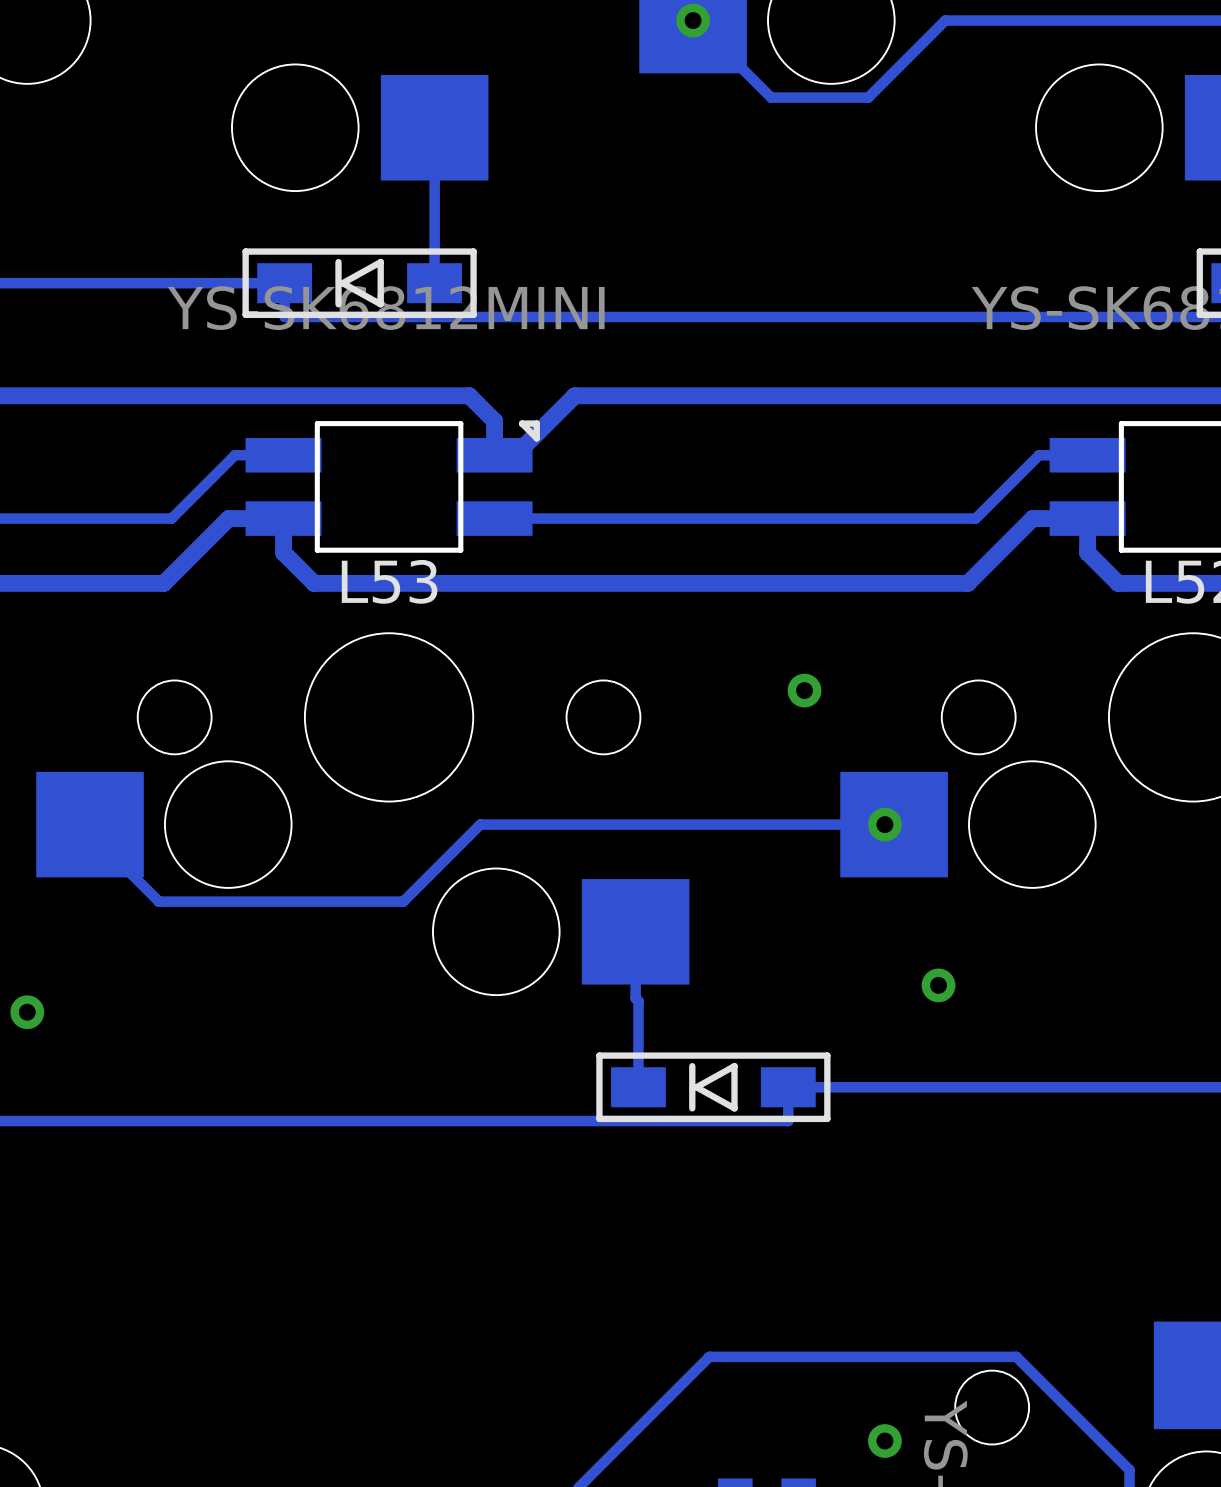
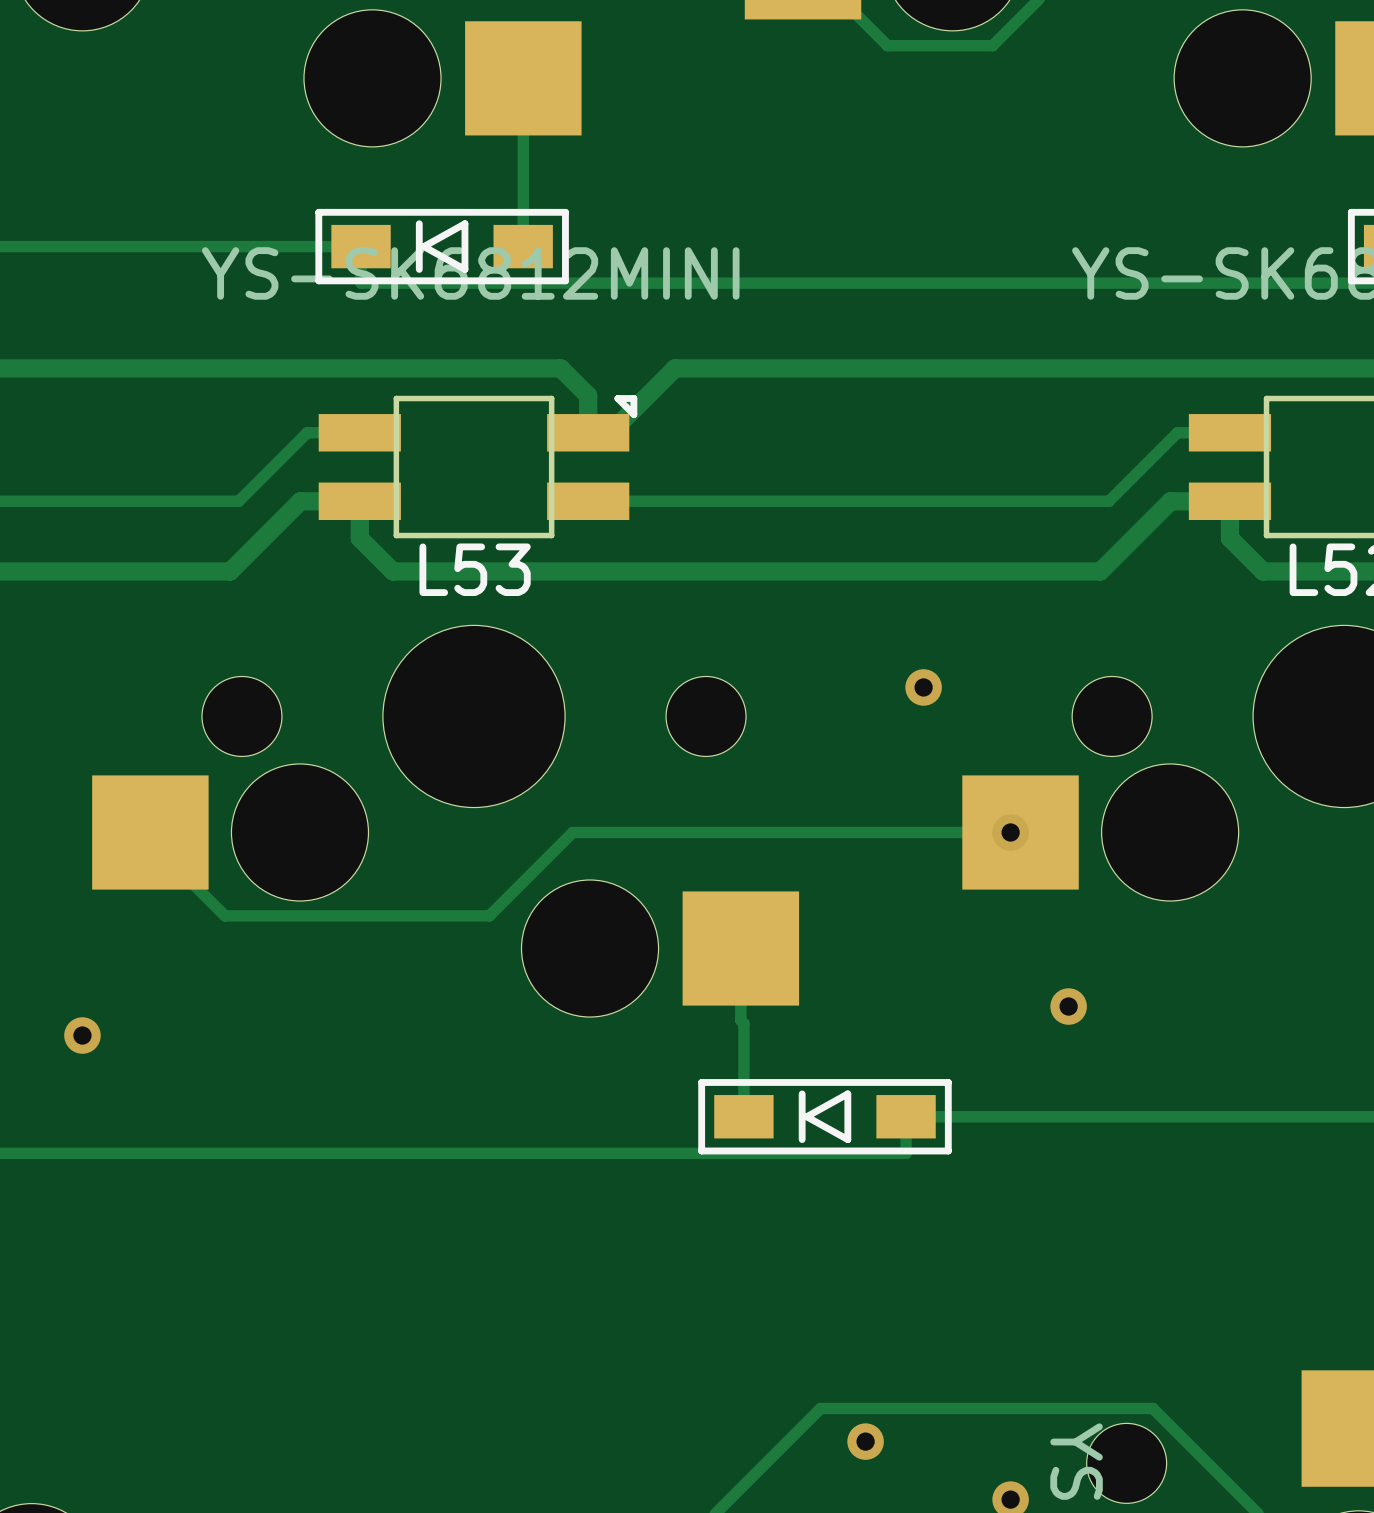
via: none -> (865, 1441)

